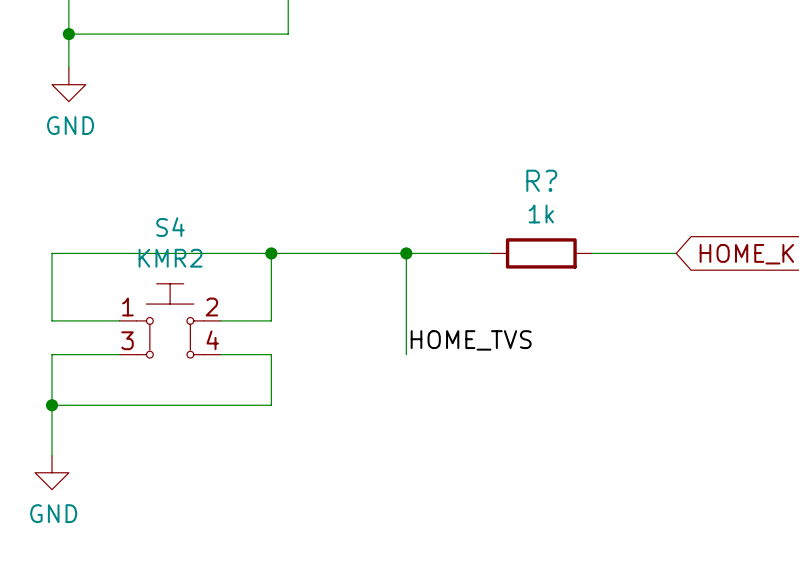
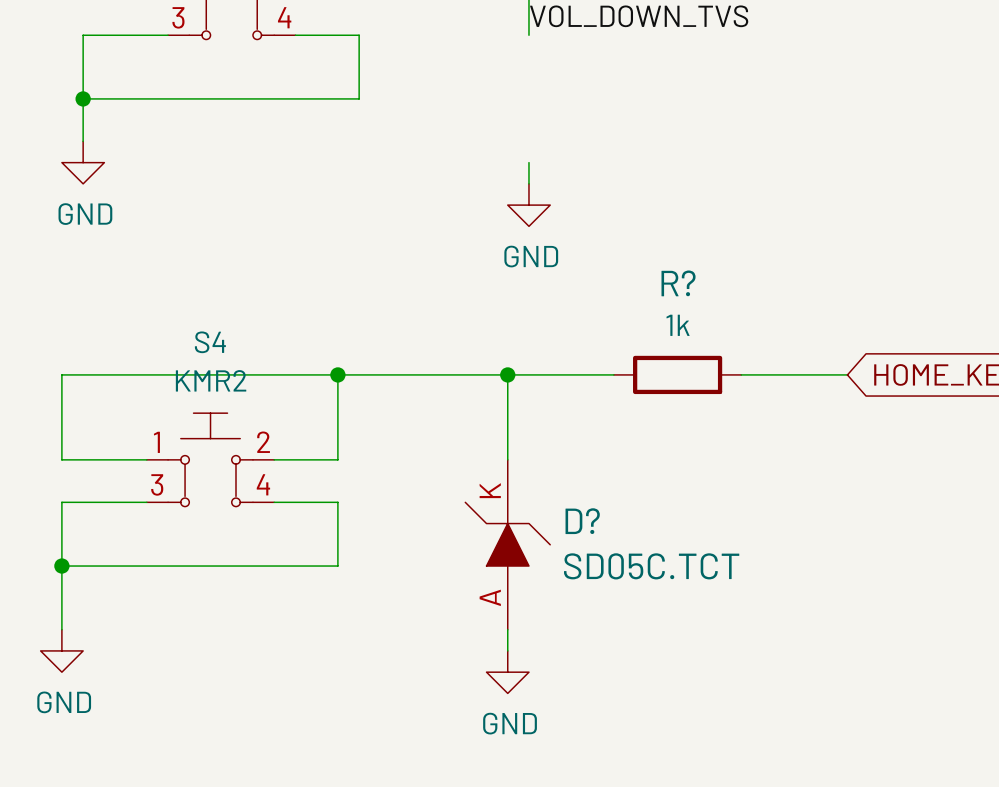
wire: none -> (528, 162) (528, 183)
power symbol: none -> GND (528, 205)
label: HOME_TVS (471, 340) -> none
D?: none -> SD05C.TCT (507, 544)
wire: none -> (507, 629) (507, 650)
power symbol: none -> GND (507, 672)

